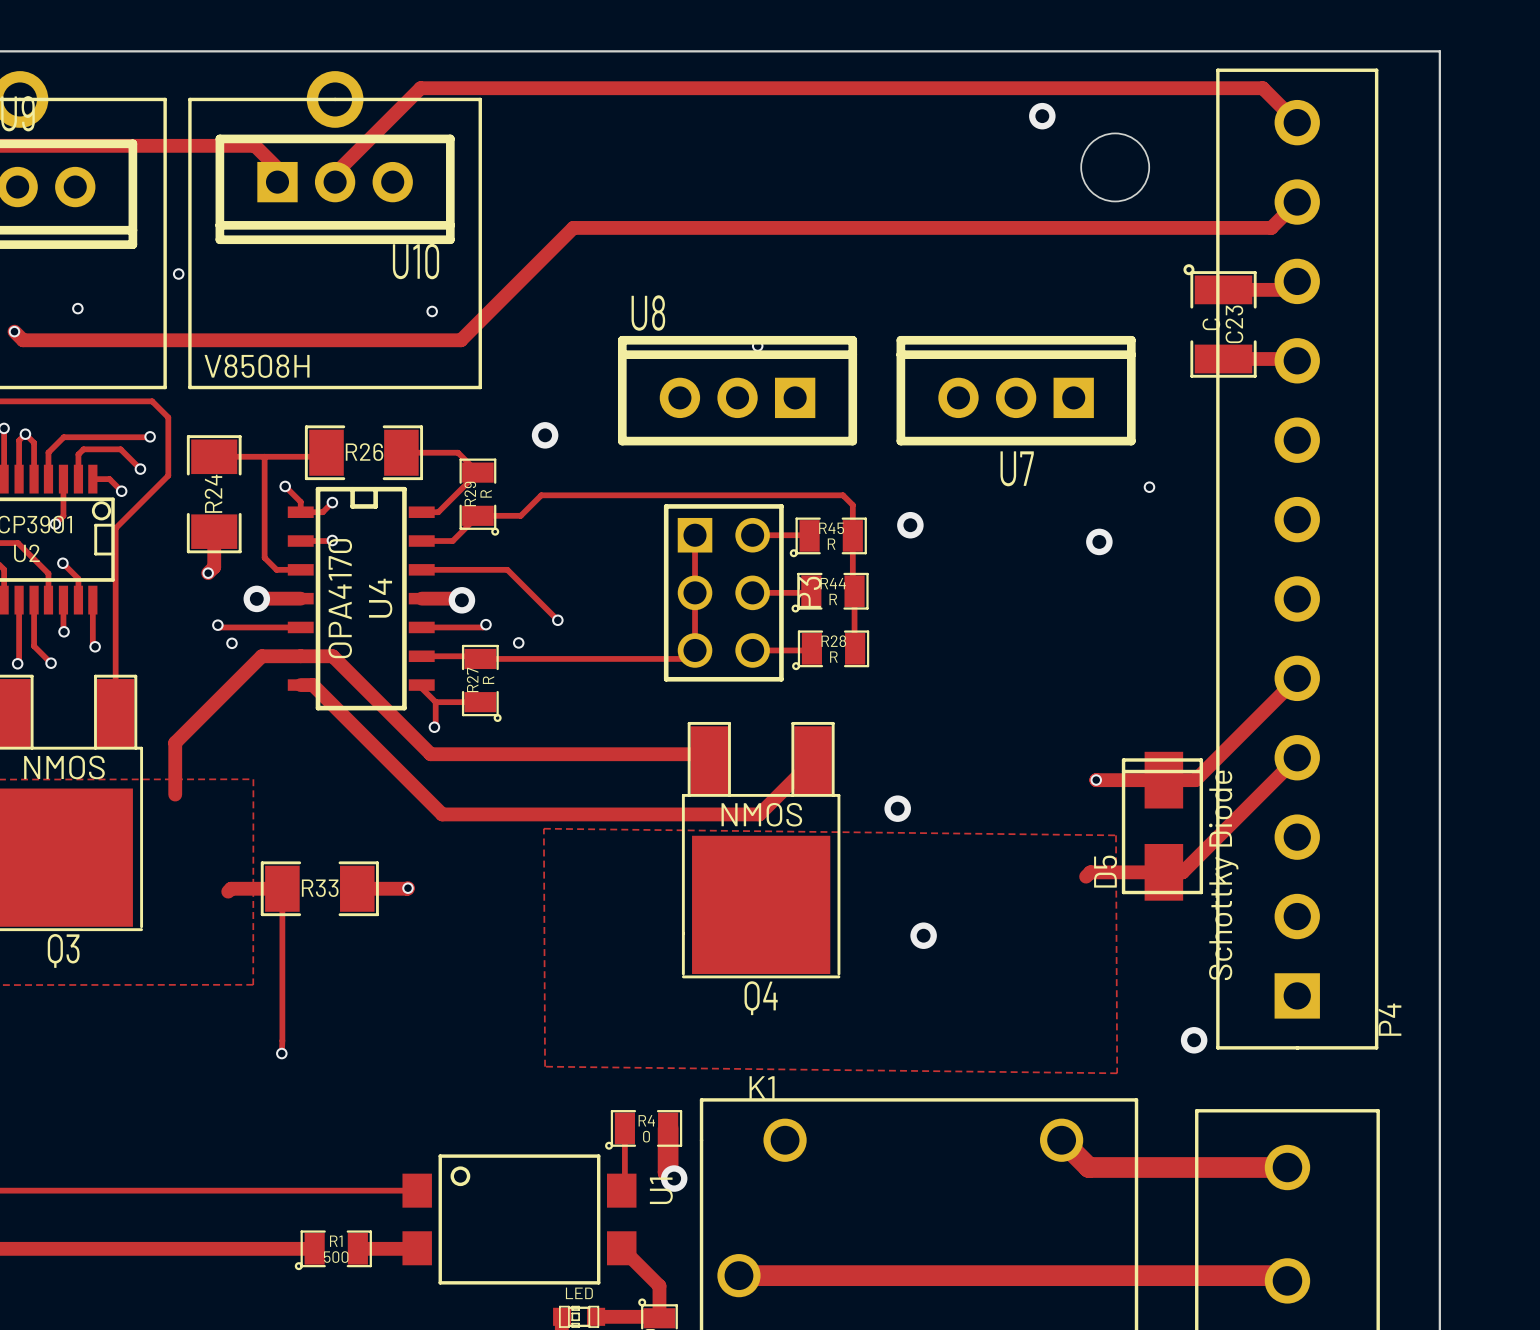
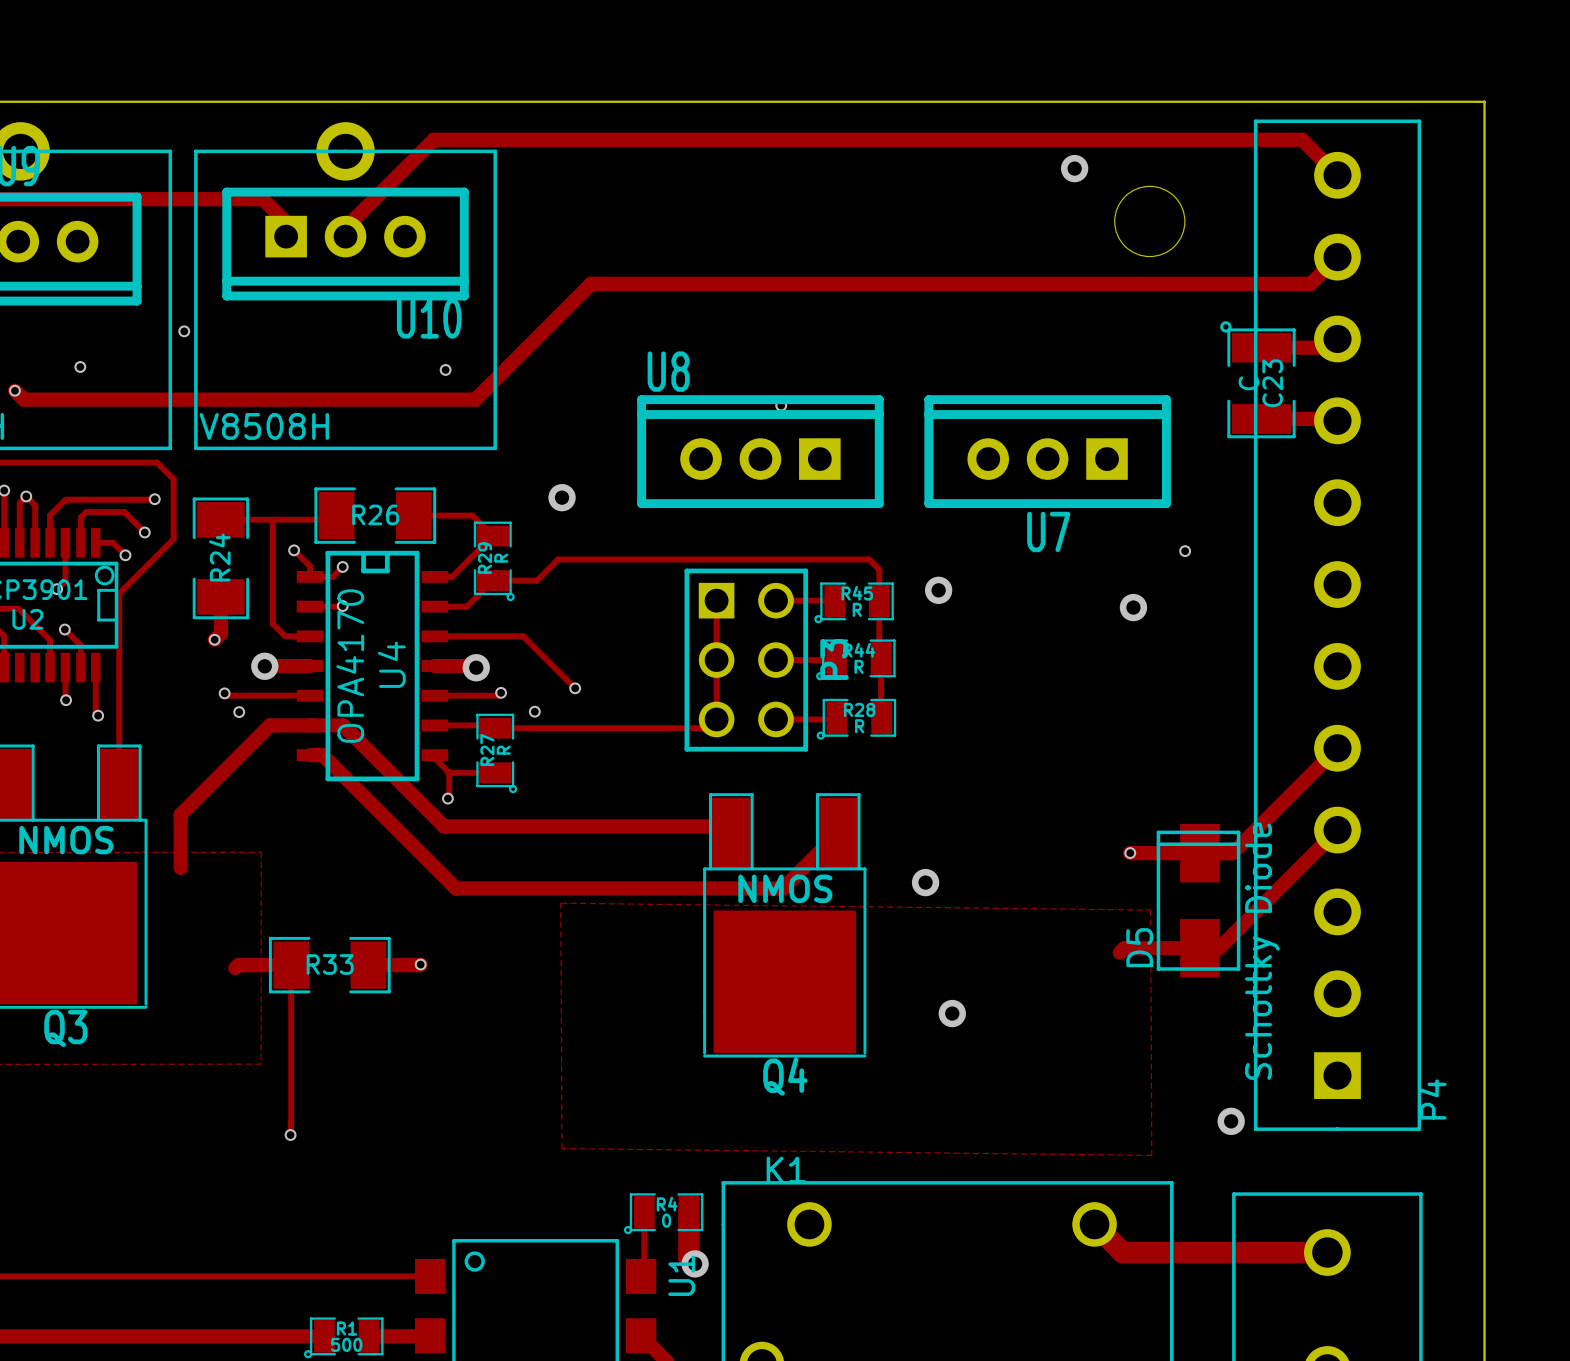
track: (19, 600) (17, 663) -> none
track: (34, 600) (34, 646) (51, 663) -> none
via: (17, 663) -> none
via: (51, 663) -> none

